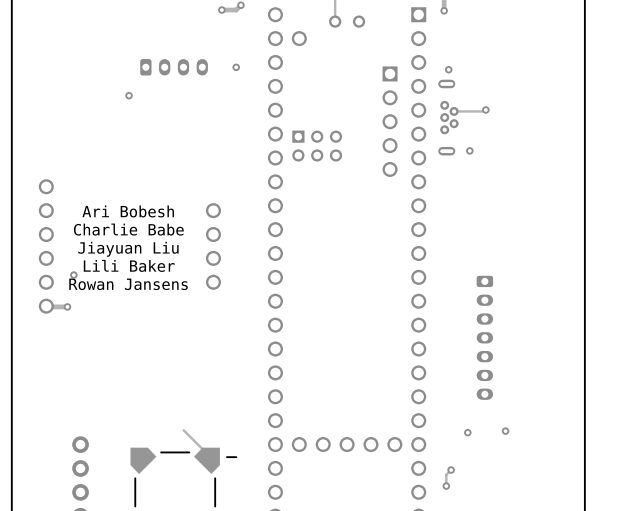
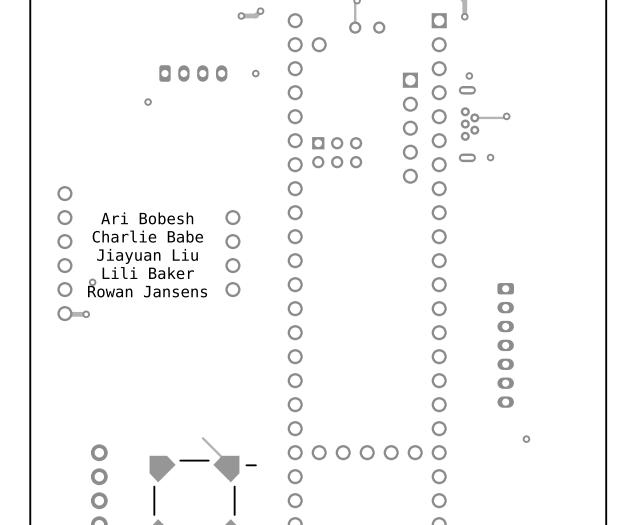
via: (467, 432) -> none
track: (451, 470) (446, 474) (446, 486) -> none
via: (451, 470) -> none
via: (446, 486) -> none

